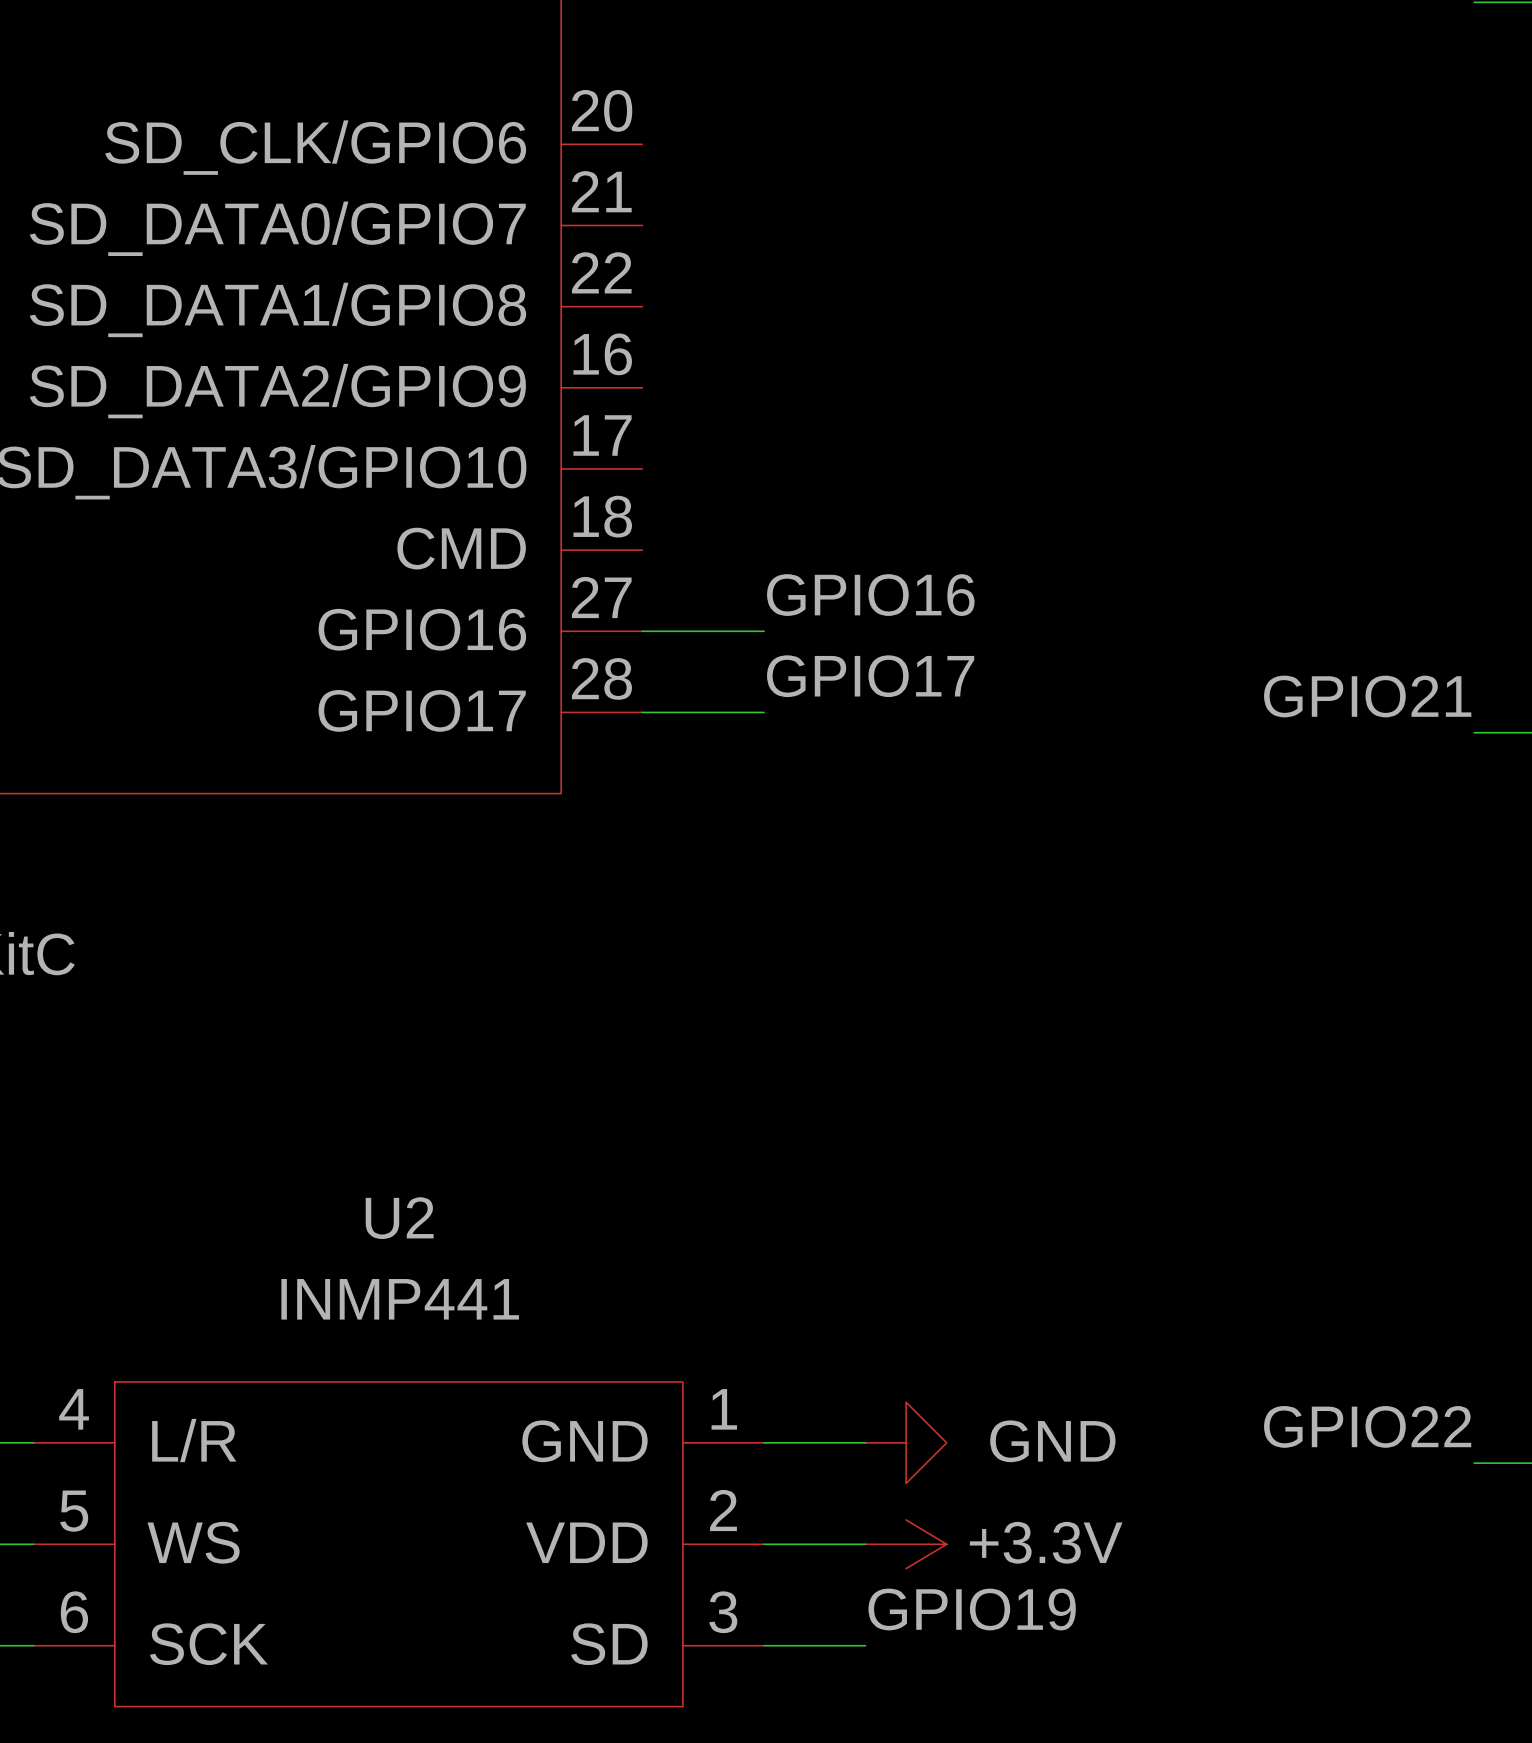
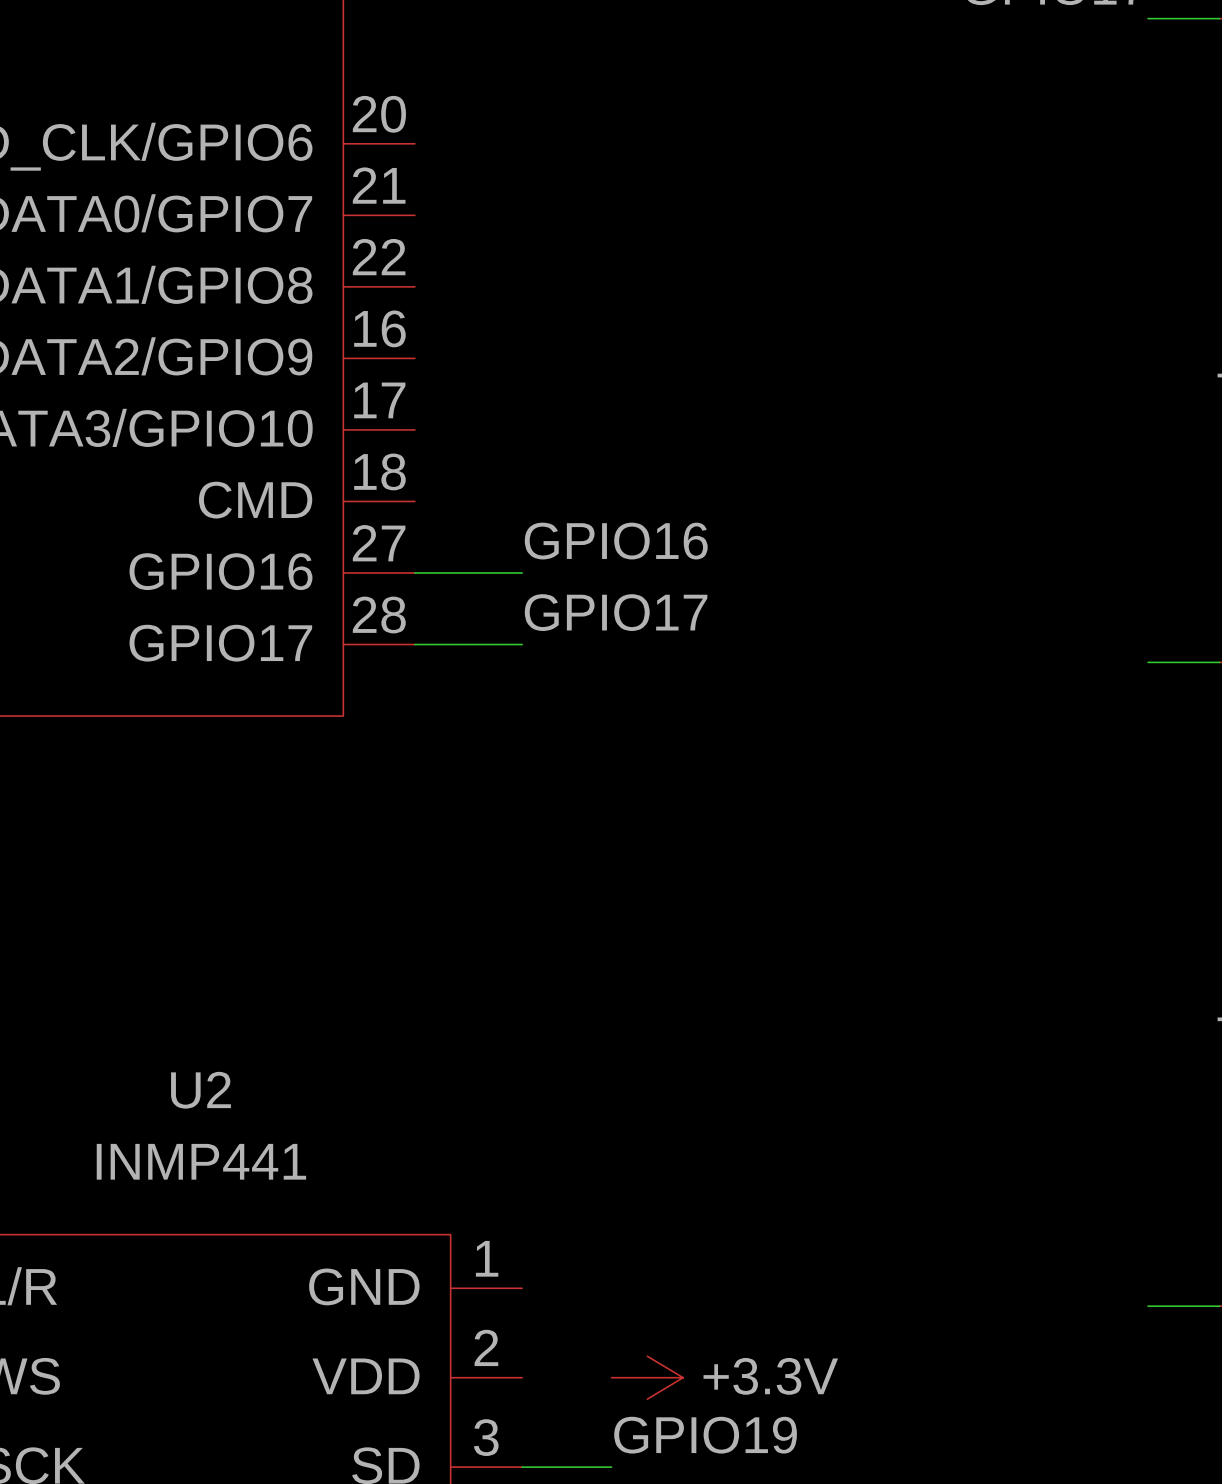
label: GPIO21 (1367, 696) -> none
label: GPIO22 (1367, 1426) -> none
wire: (764, 1442) (865, 1442) -> none
power symbol: GND (906, 1442) -> none
wire: (764, 1544) (865, 1544) -> none

